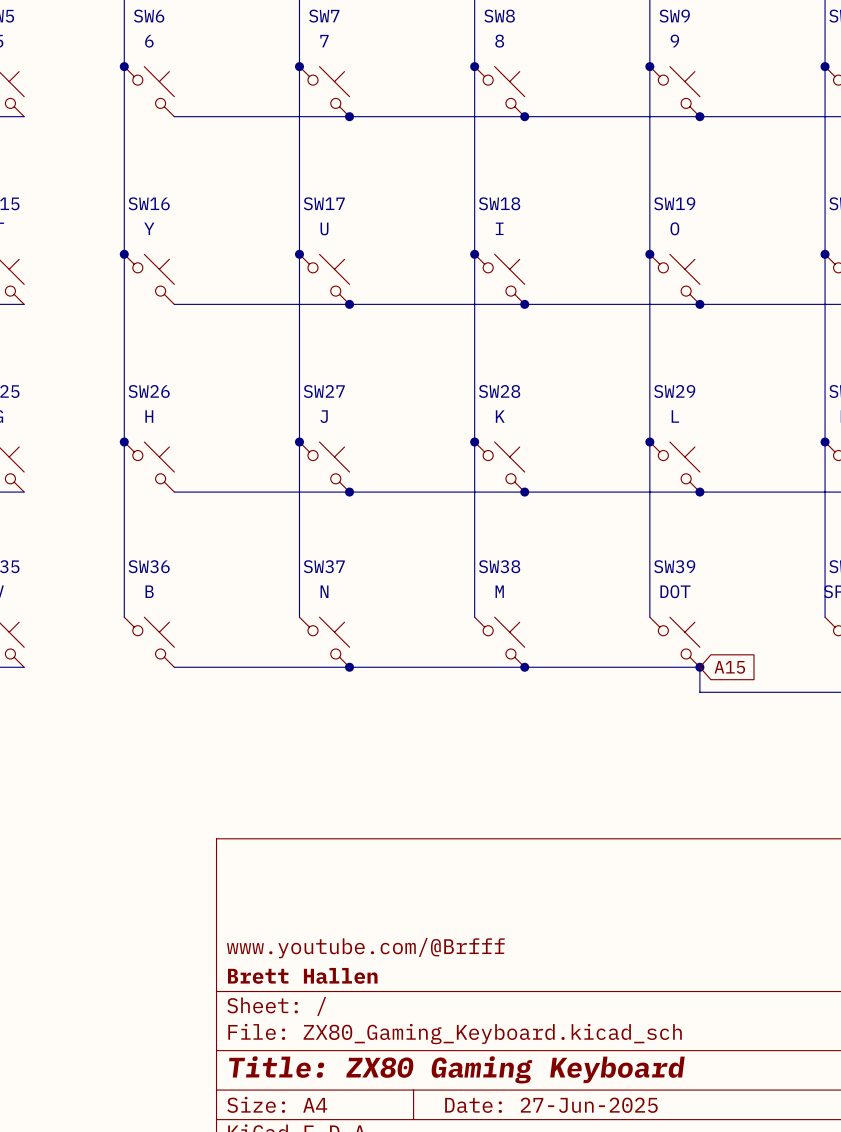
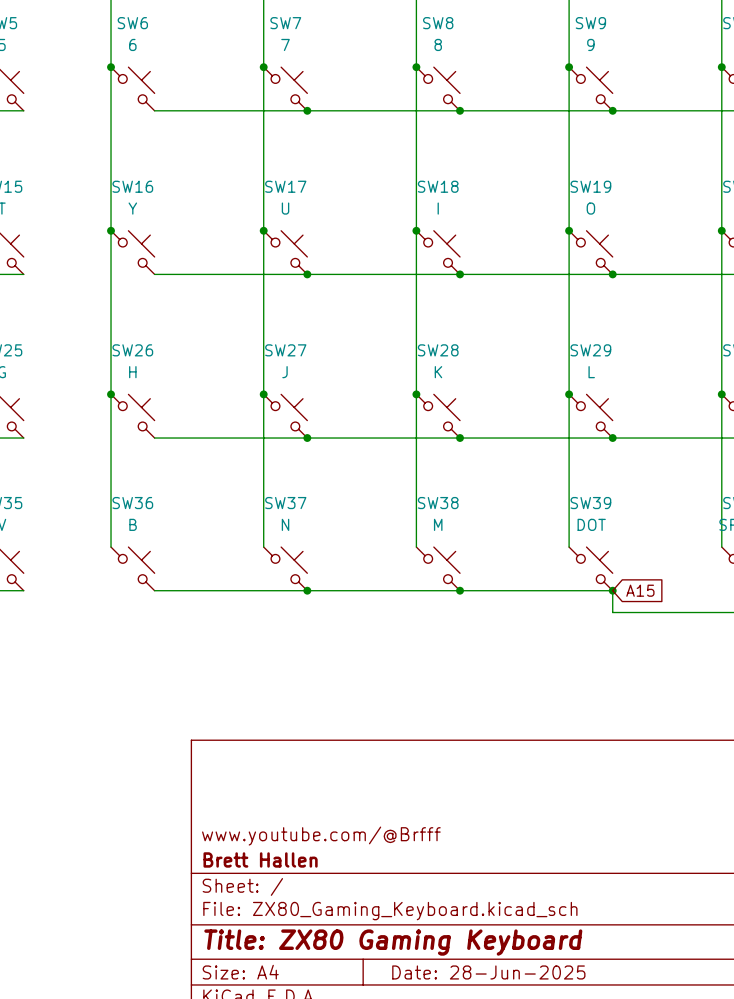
title block: Date: 27-Jun-2025 (551, 1105) -> Date: 28-Jun-2025 (488, 972)

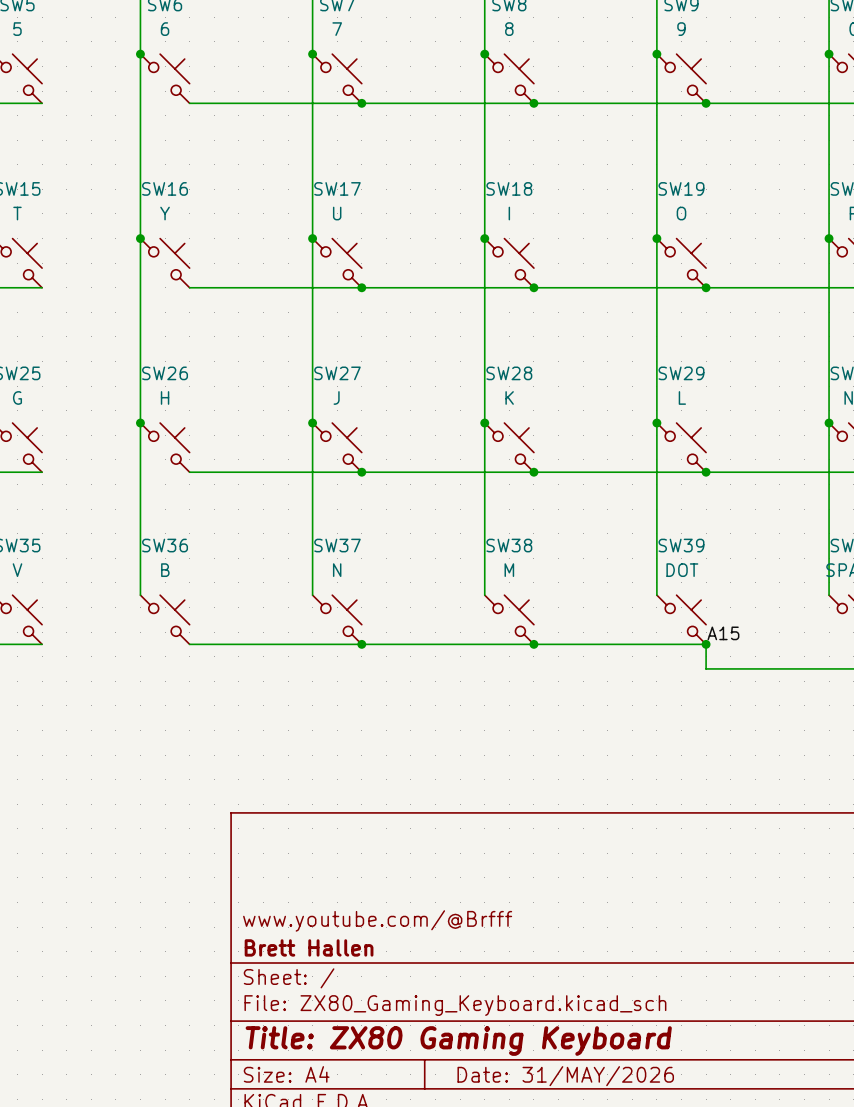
label: none -> A15 (723, 633)
global label: A15 (640, 590) -> none
title block: Date: 28-Jun-2025 (488, 972) -> Date: 31/MAY/2026 (565, 1076)

